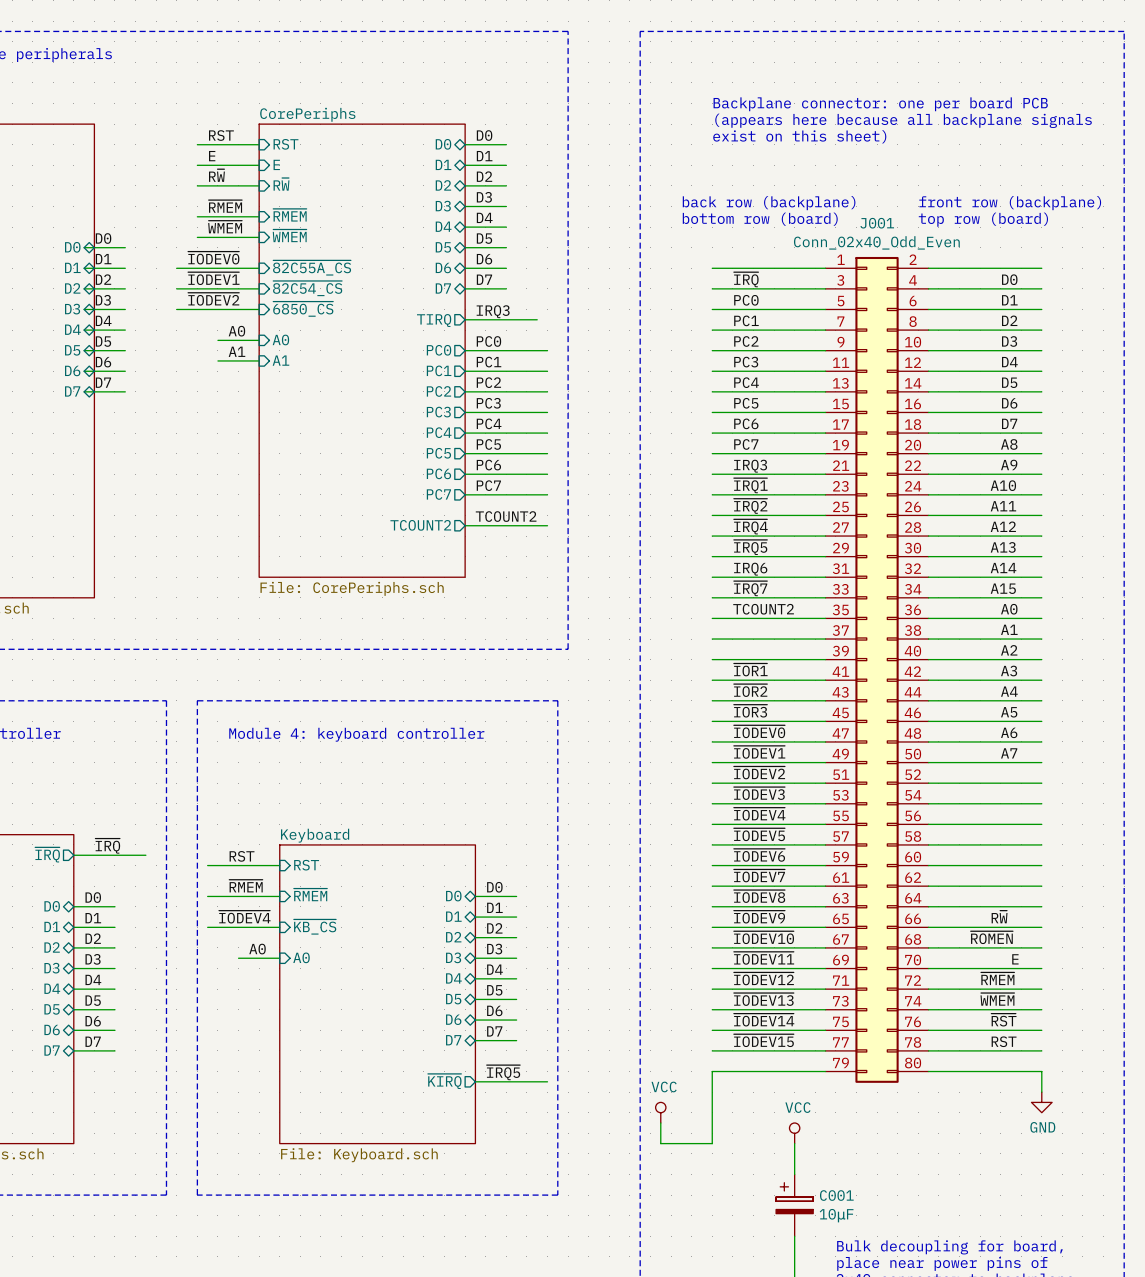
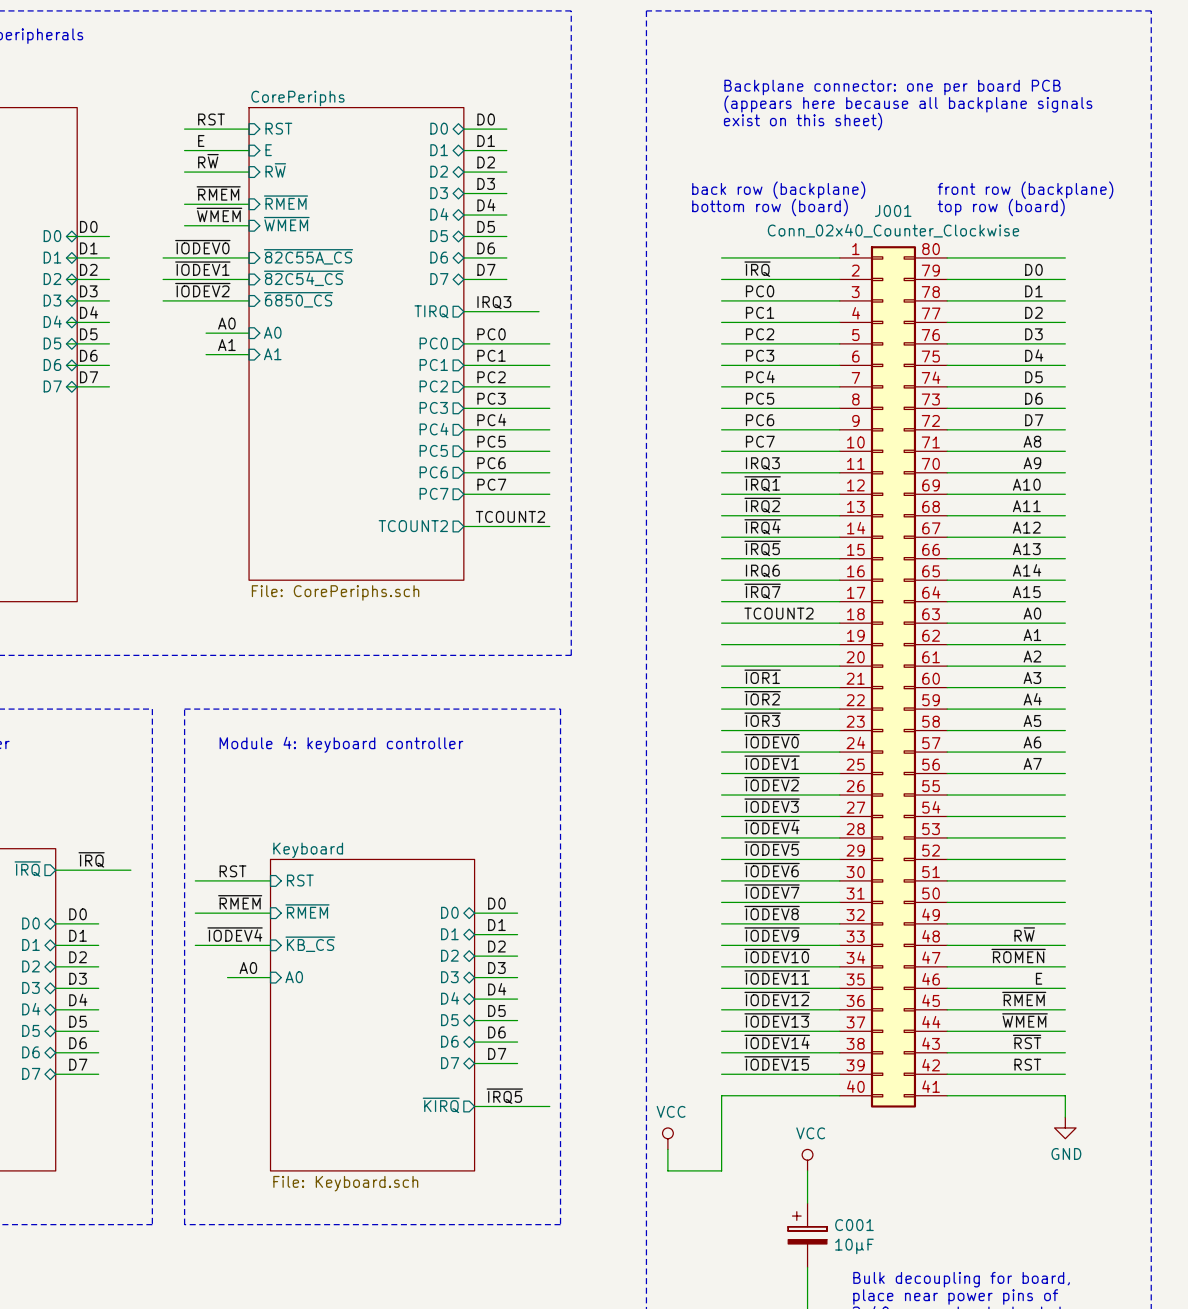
J001 value: Conn_02x40_Odd_Even (876, 242) -> Conn_02x40_Counter_Clockwise (893, 230)
J001 symbol: [825, 256, 929, 1083] -> [839, 246, 948, 1108]

